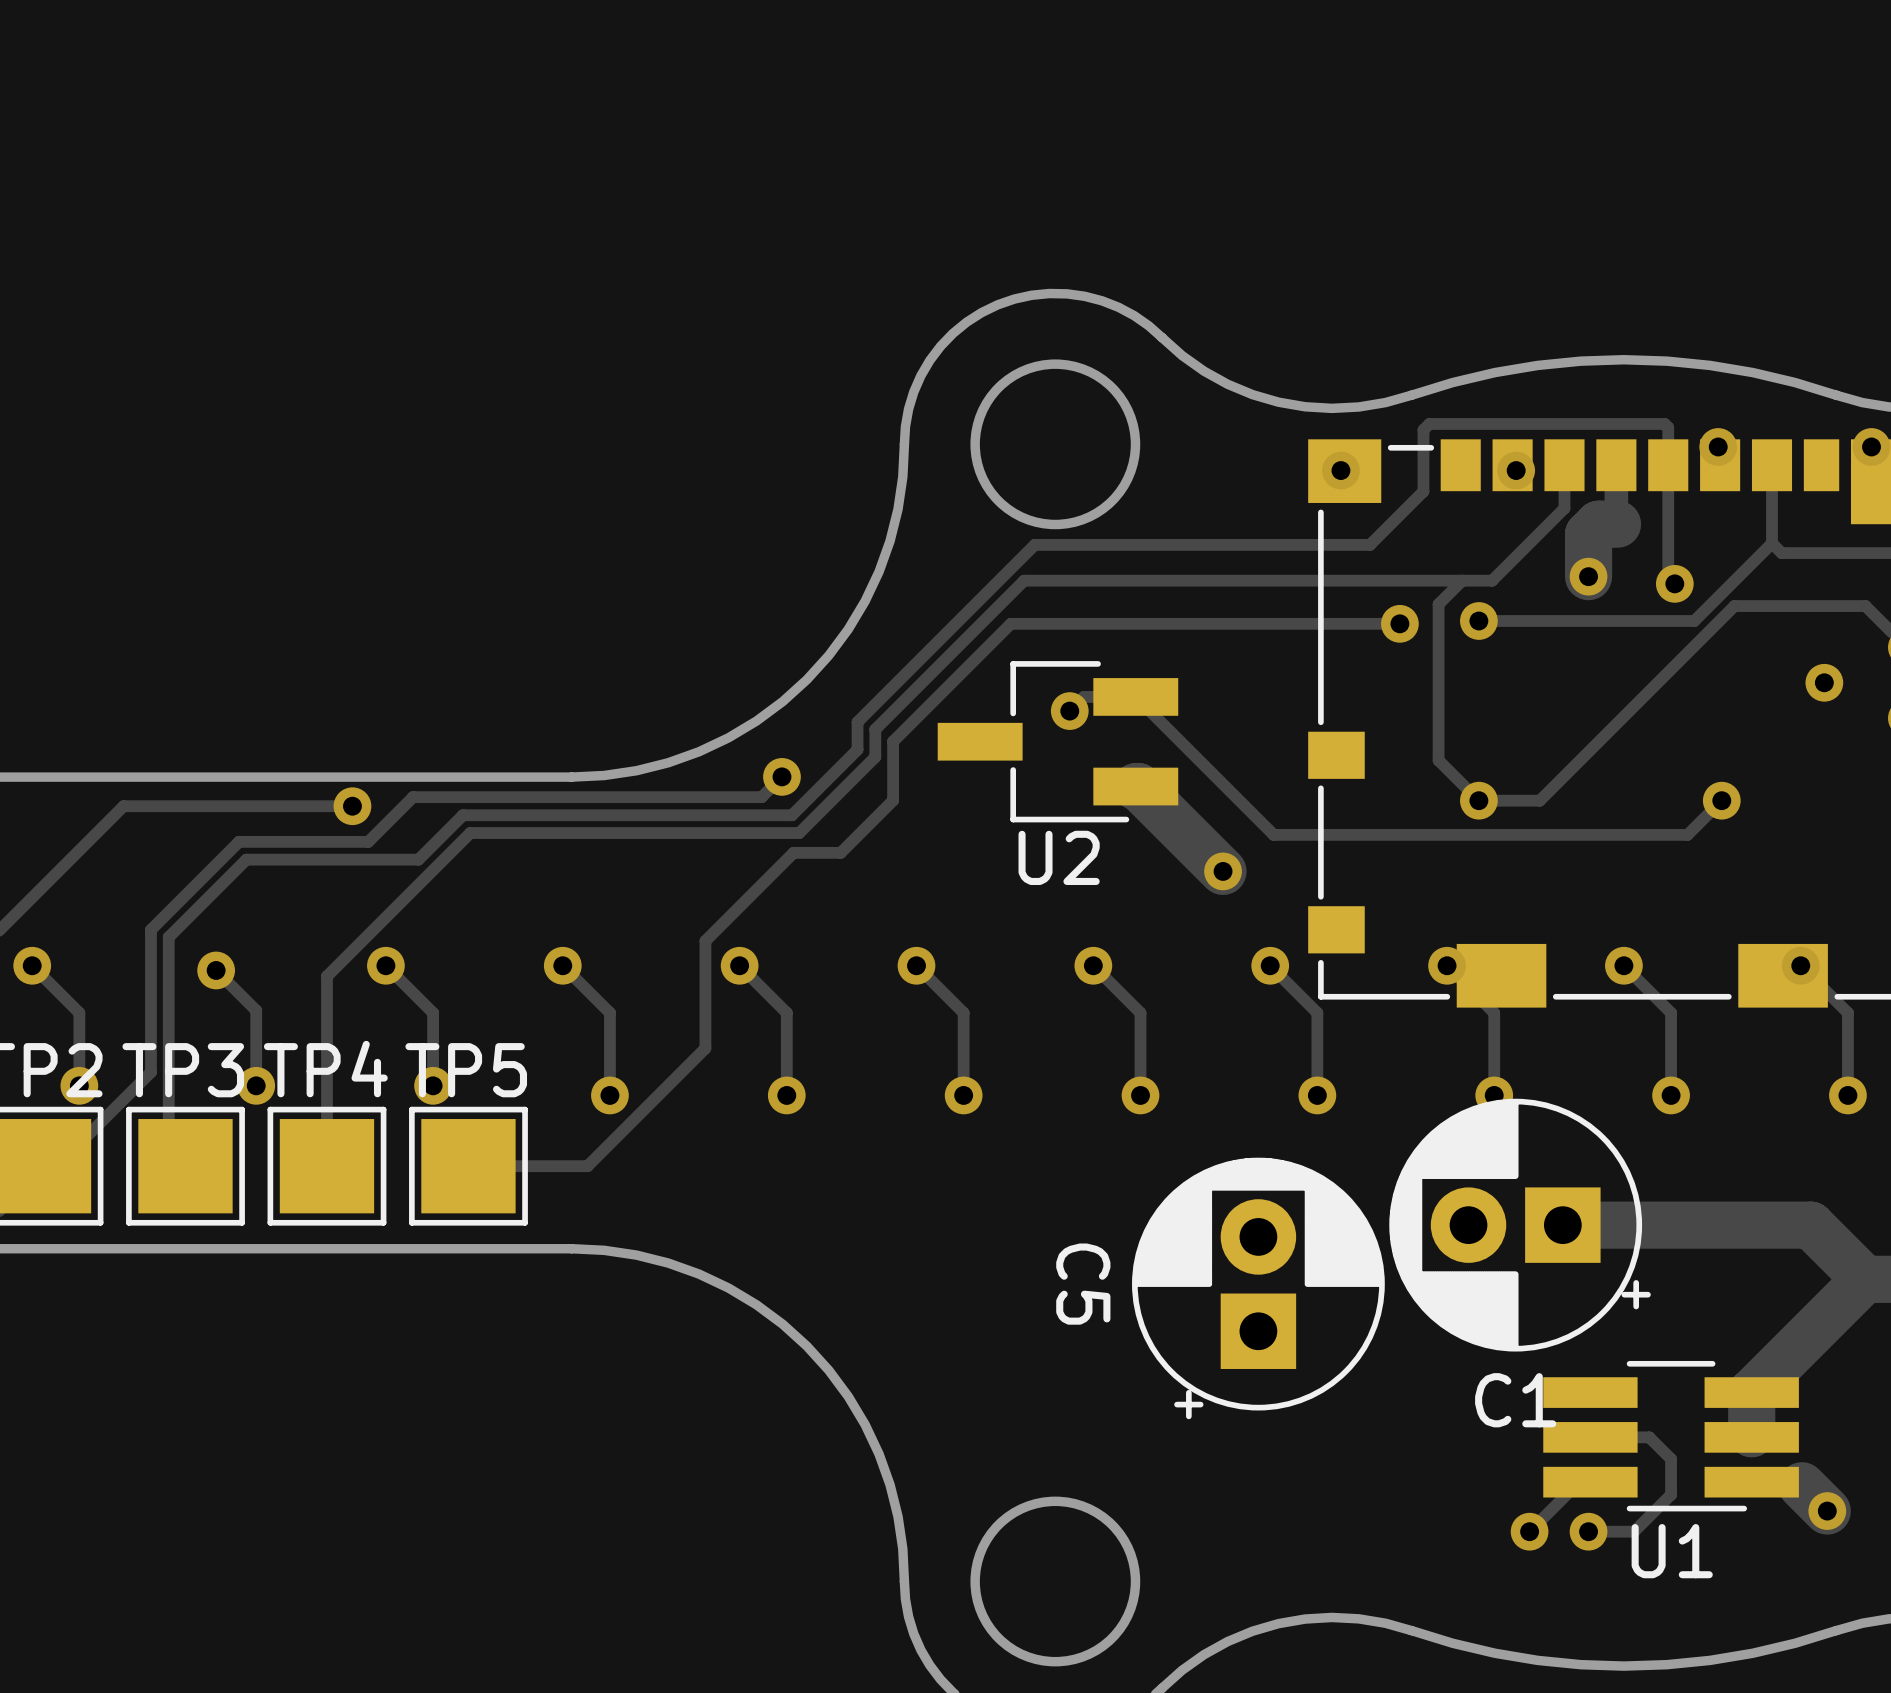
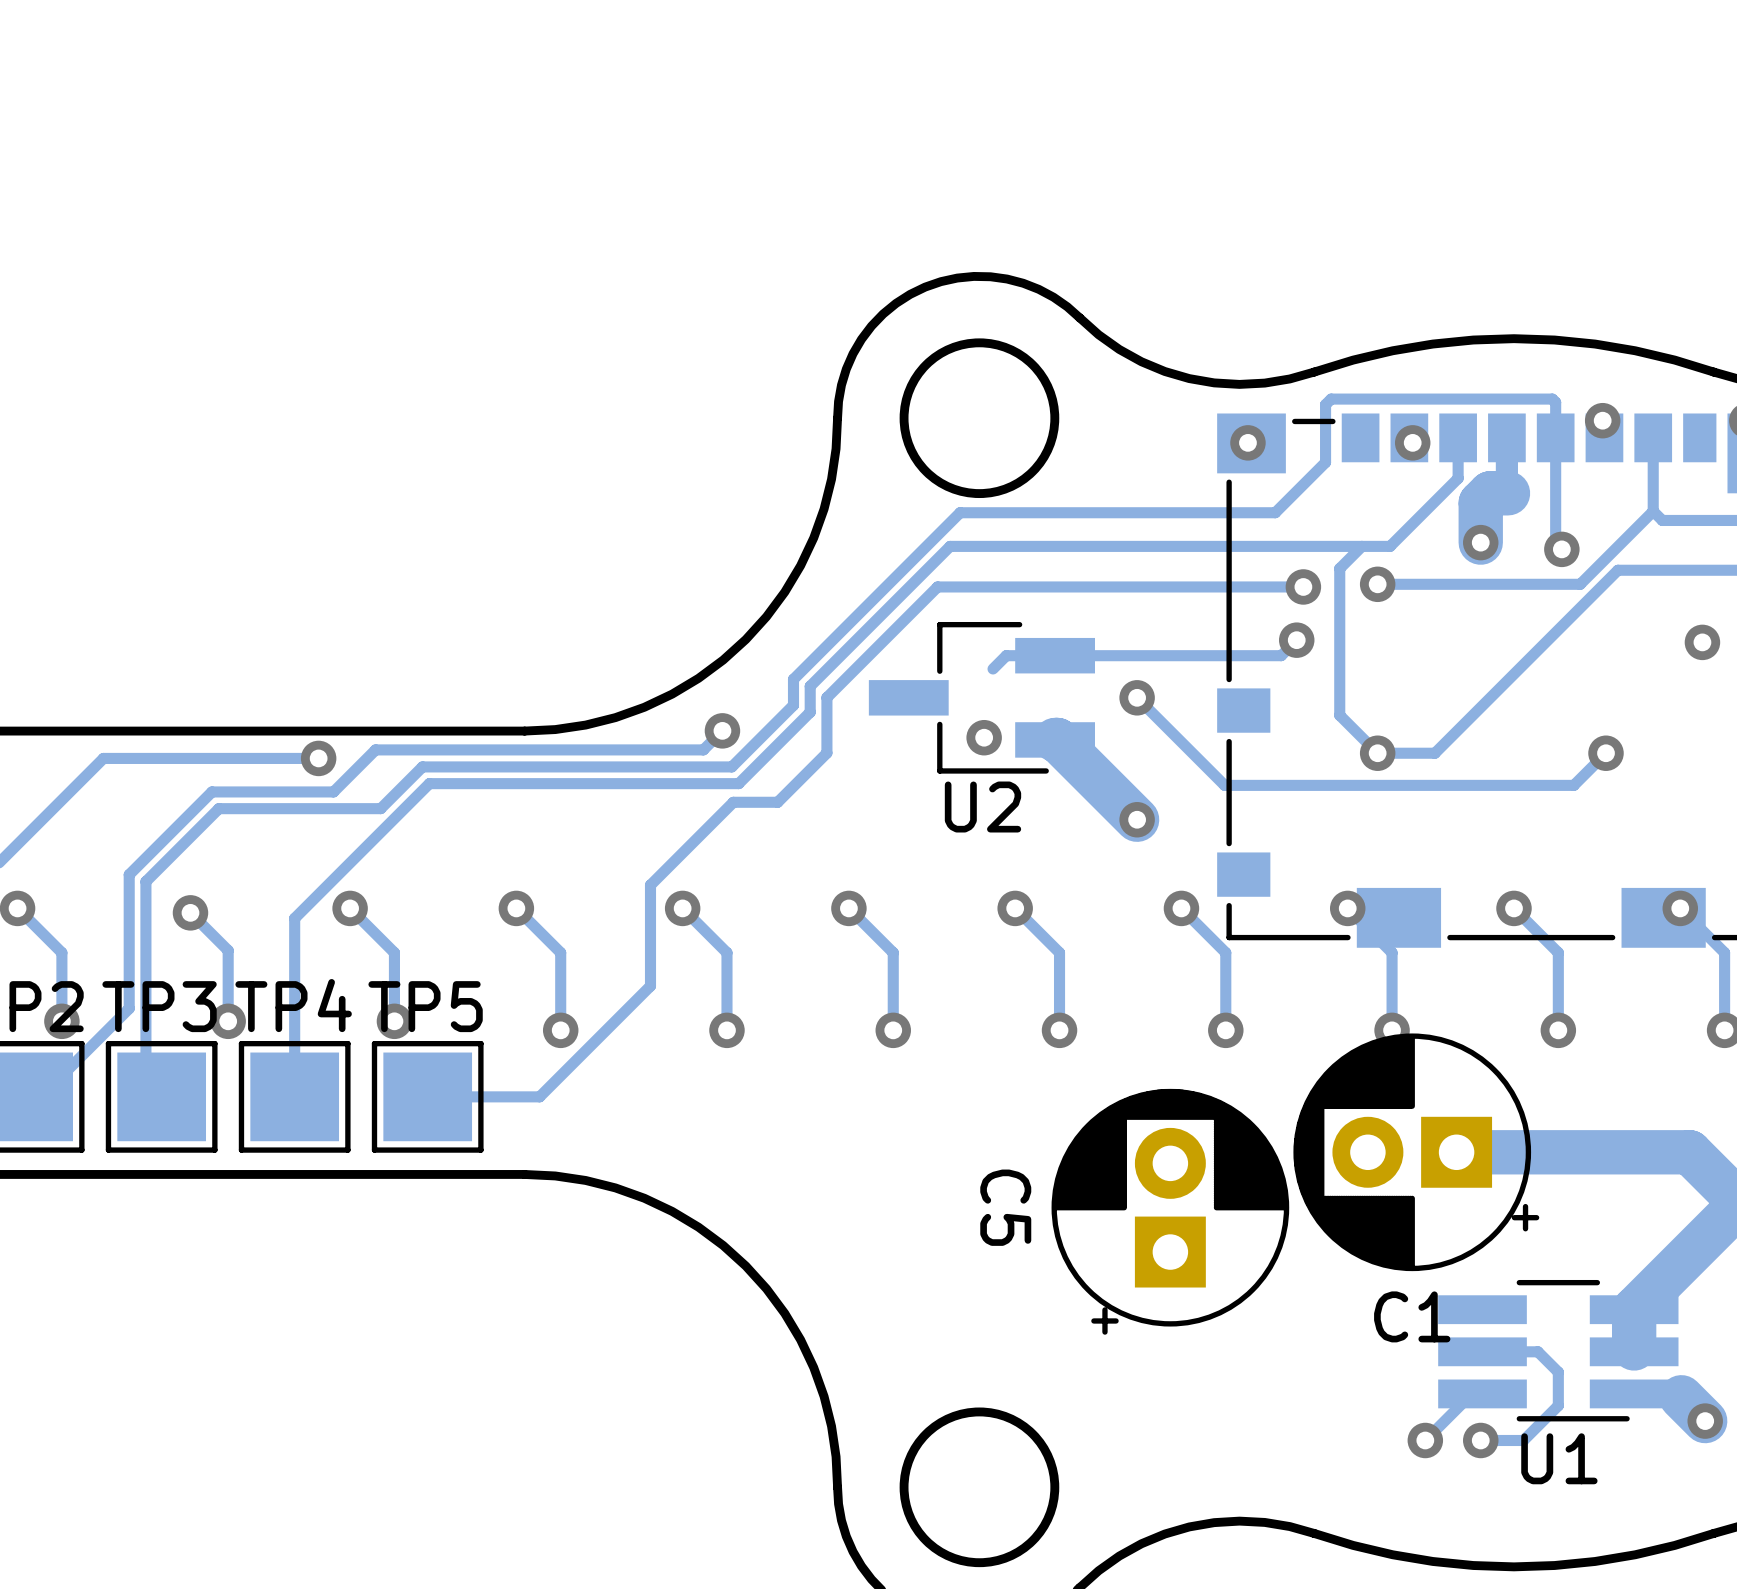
track: none -> (1296, 640) (1281, 655) (1055, 655)
via: none -> (1296, 640)
track: (1135, 696) (1273, 834) (1316, 834) -> (1137, 697) (1224, 785)
via position: (1069, 711) -> (984, 737)
via: none -> (1137, 697)

